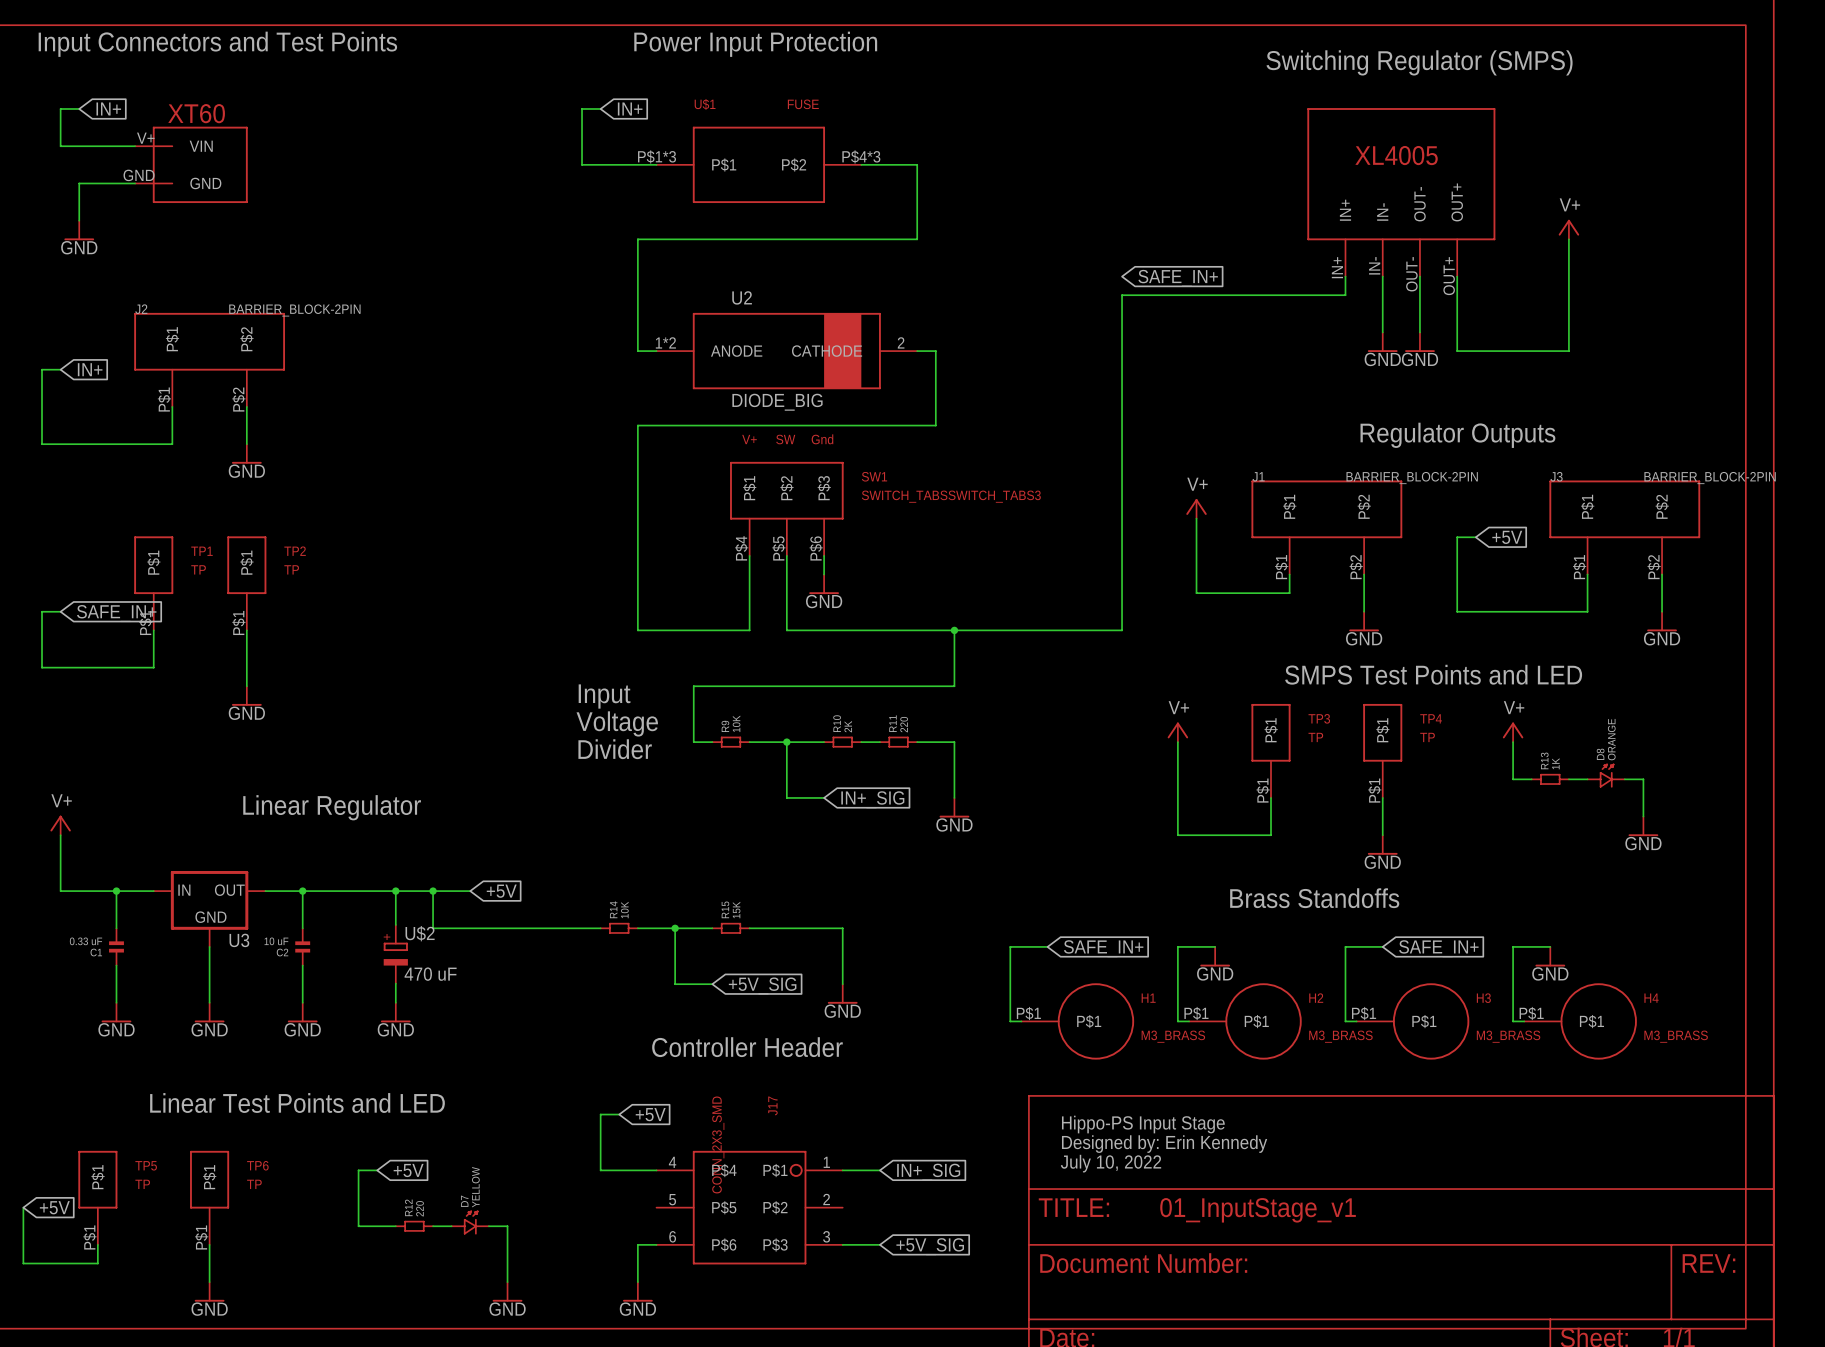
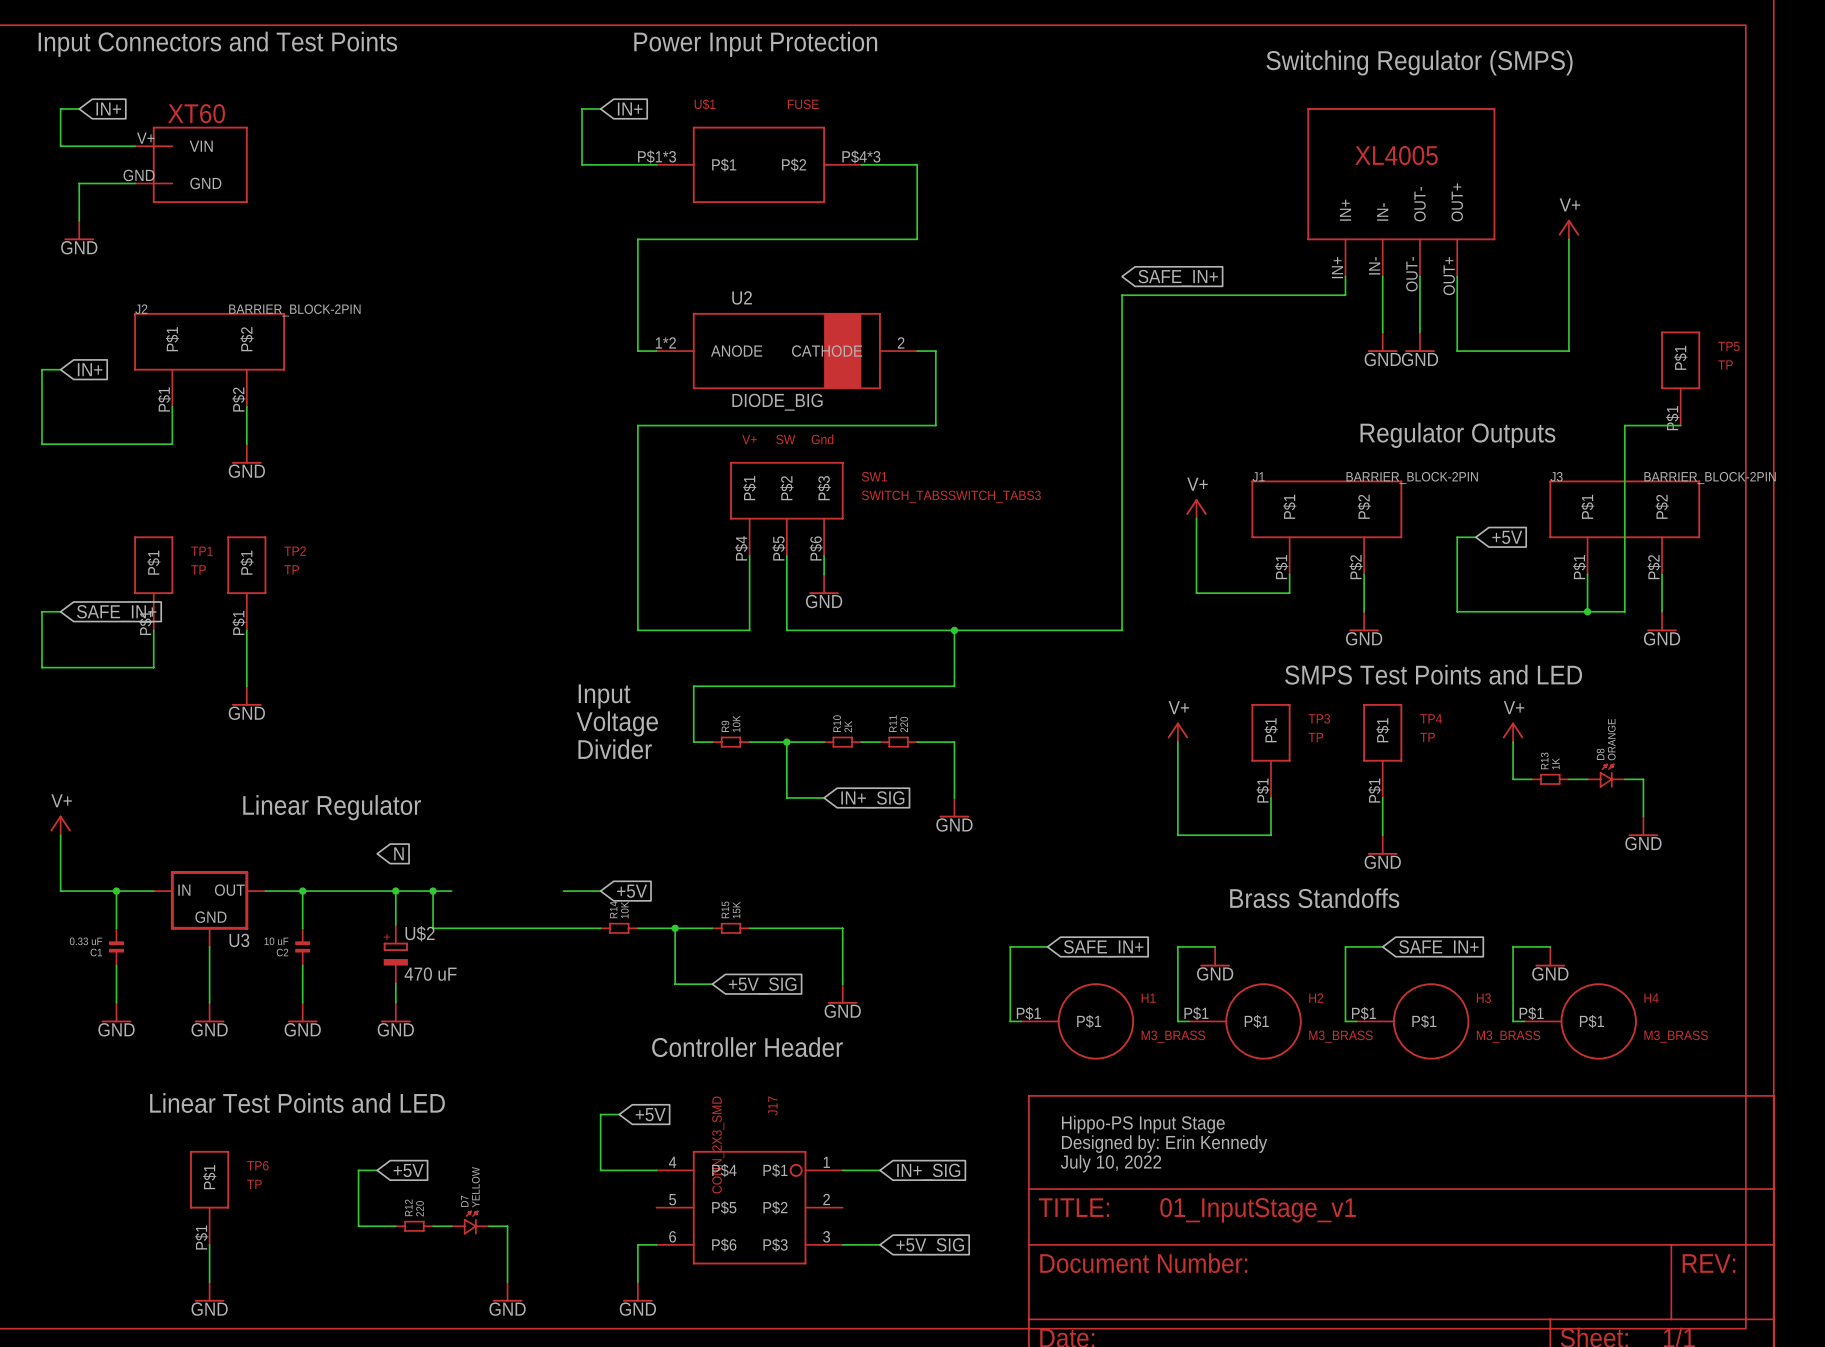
wire: none -> (1680, 425) (1624, 425) (1624, 611) (1587, 611)
junction: none -> (1587, 611)
global label: none -> N (398, 853)
wire: (451, 891) (470, 891) -> none
global label position: +5V (501, 891) -> +5V (632, 891)
wire: none -> (563, 891) (600, 891)
TP5 position: (97, 1197) -> (1680, 378)
wire: (23, 1207) (23, 1263) (97, 1263) (97, 1244) -> none
global label: +5V (54, 1207) -> none

